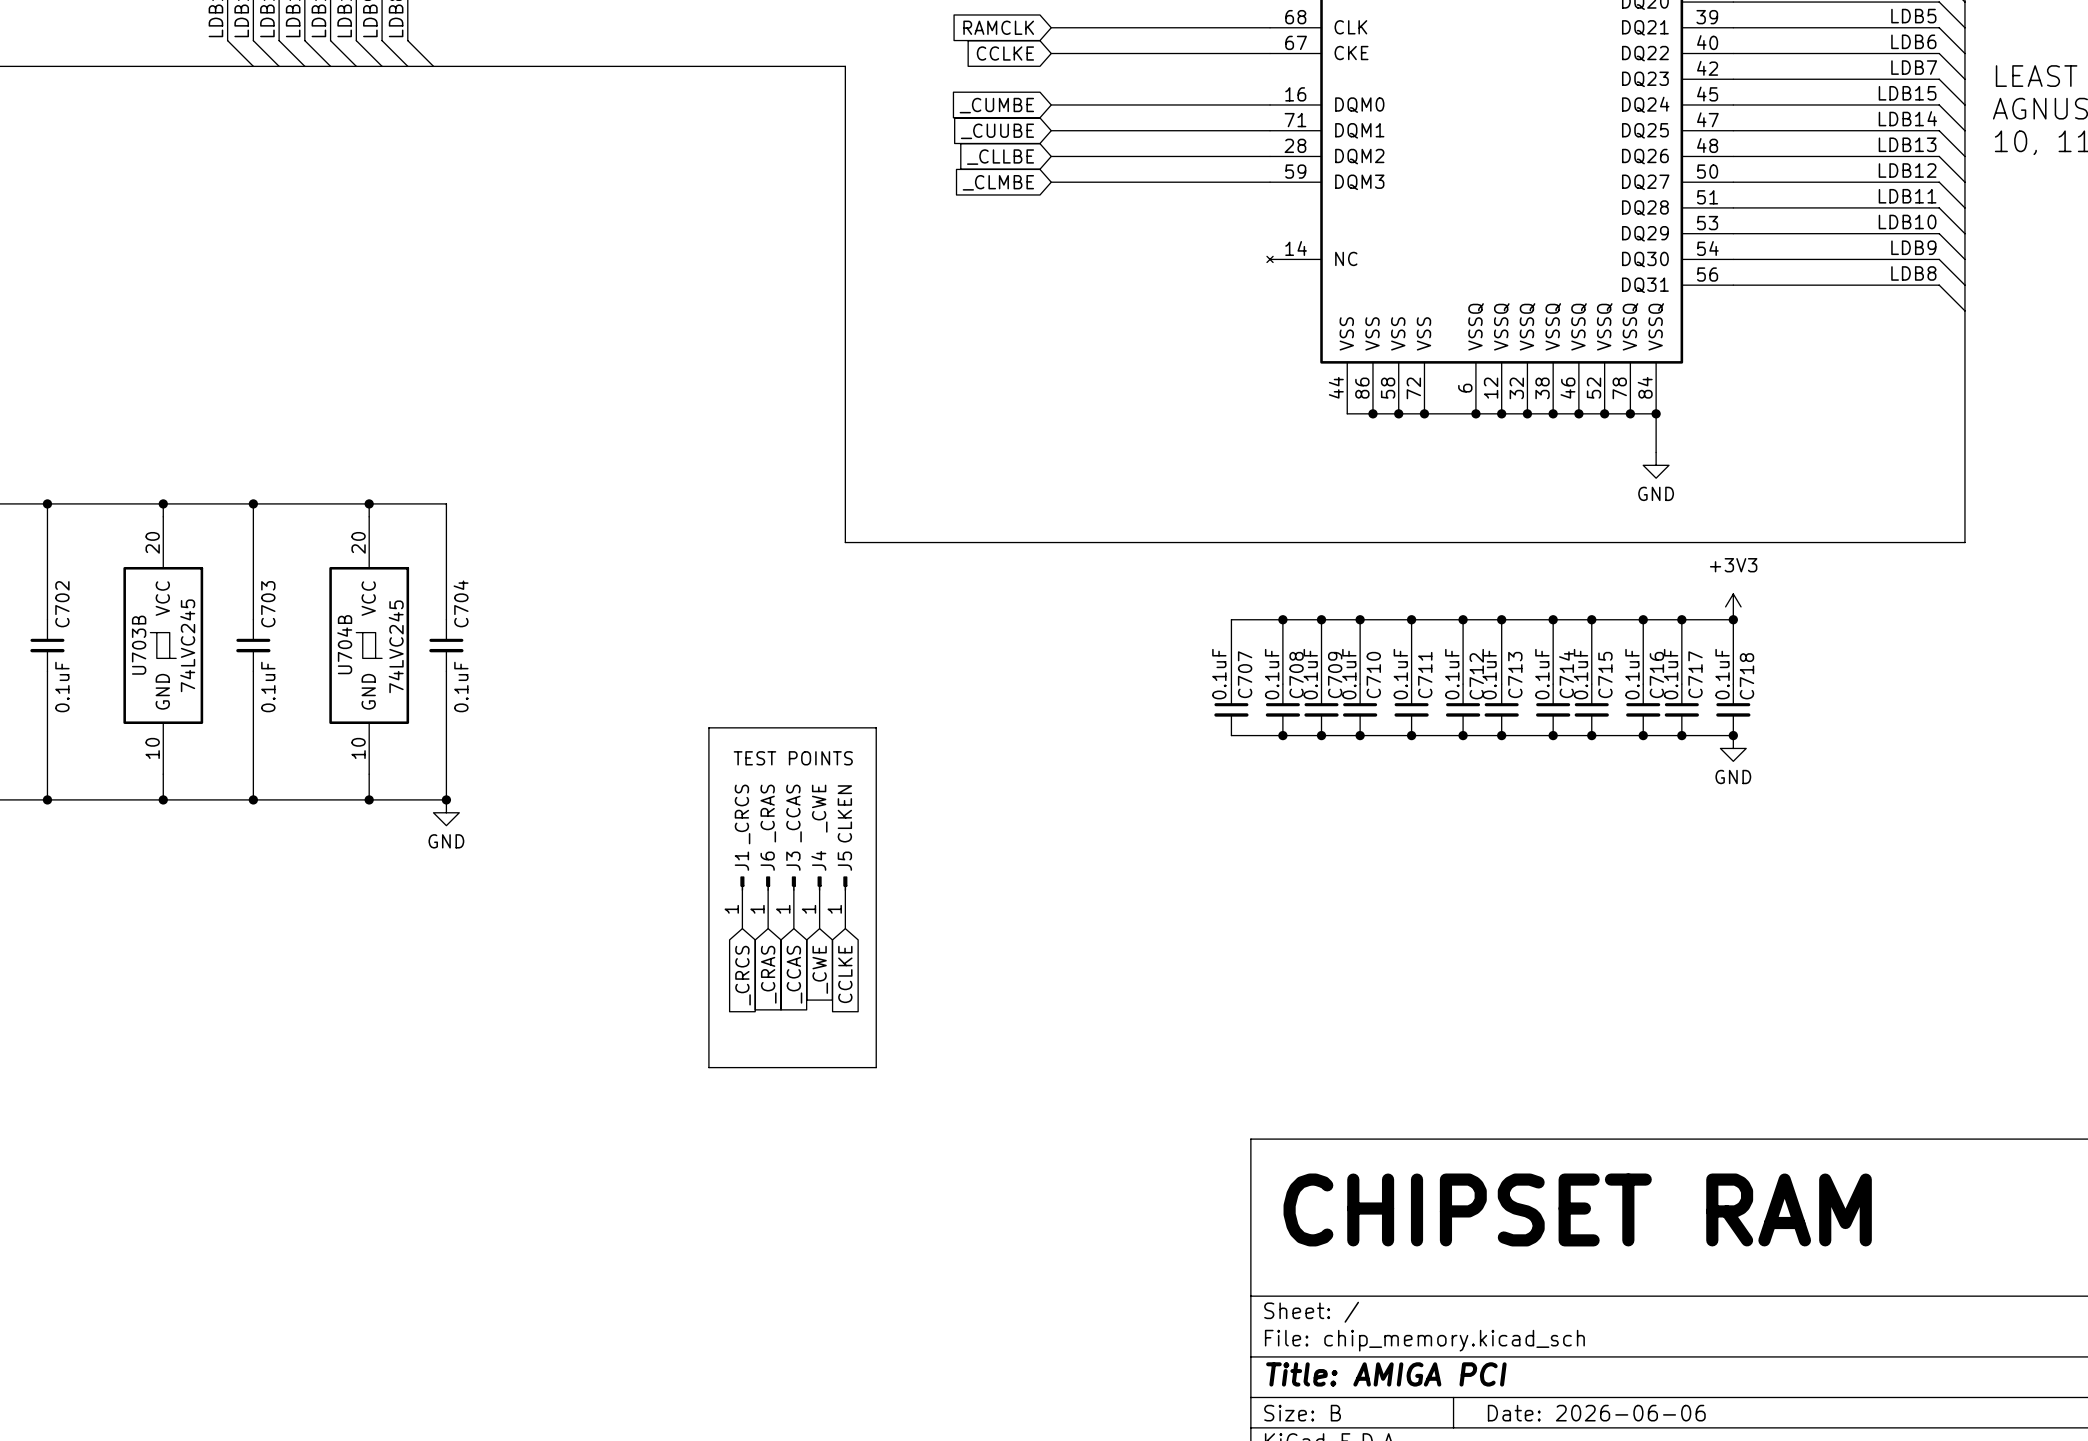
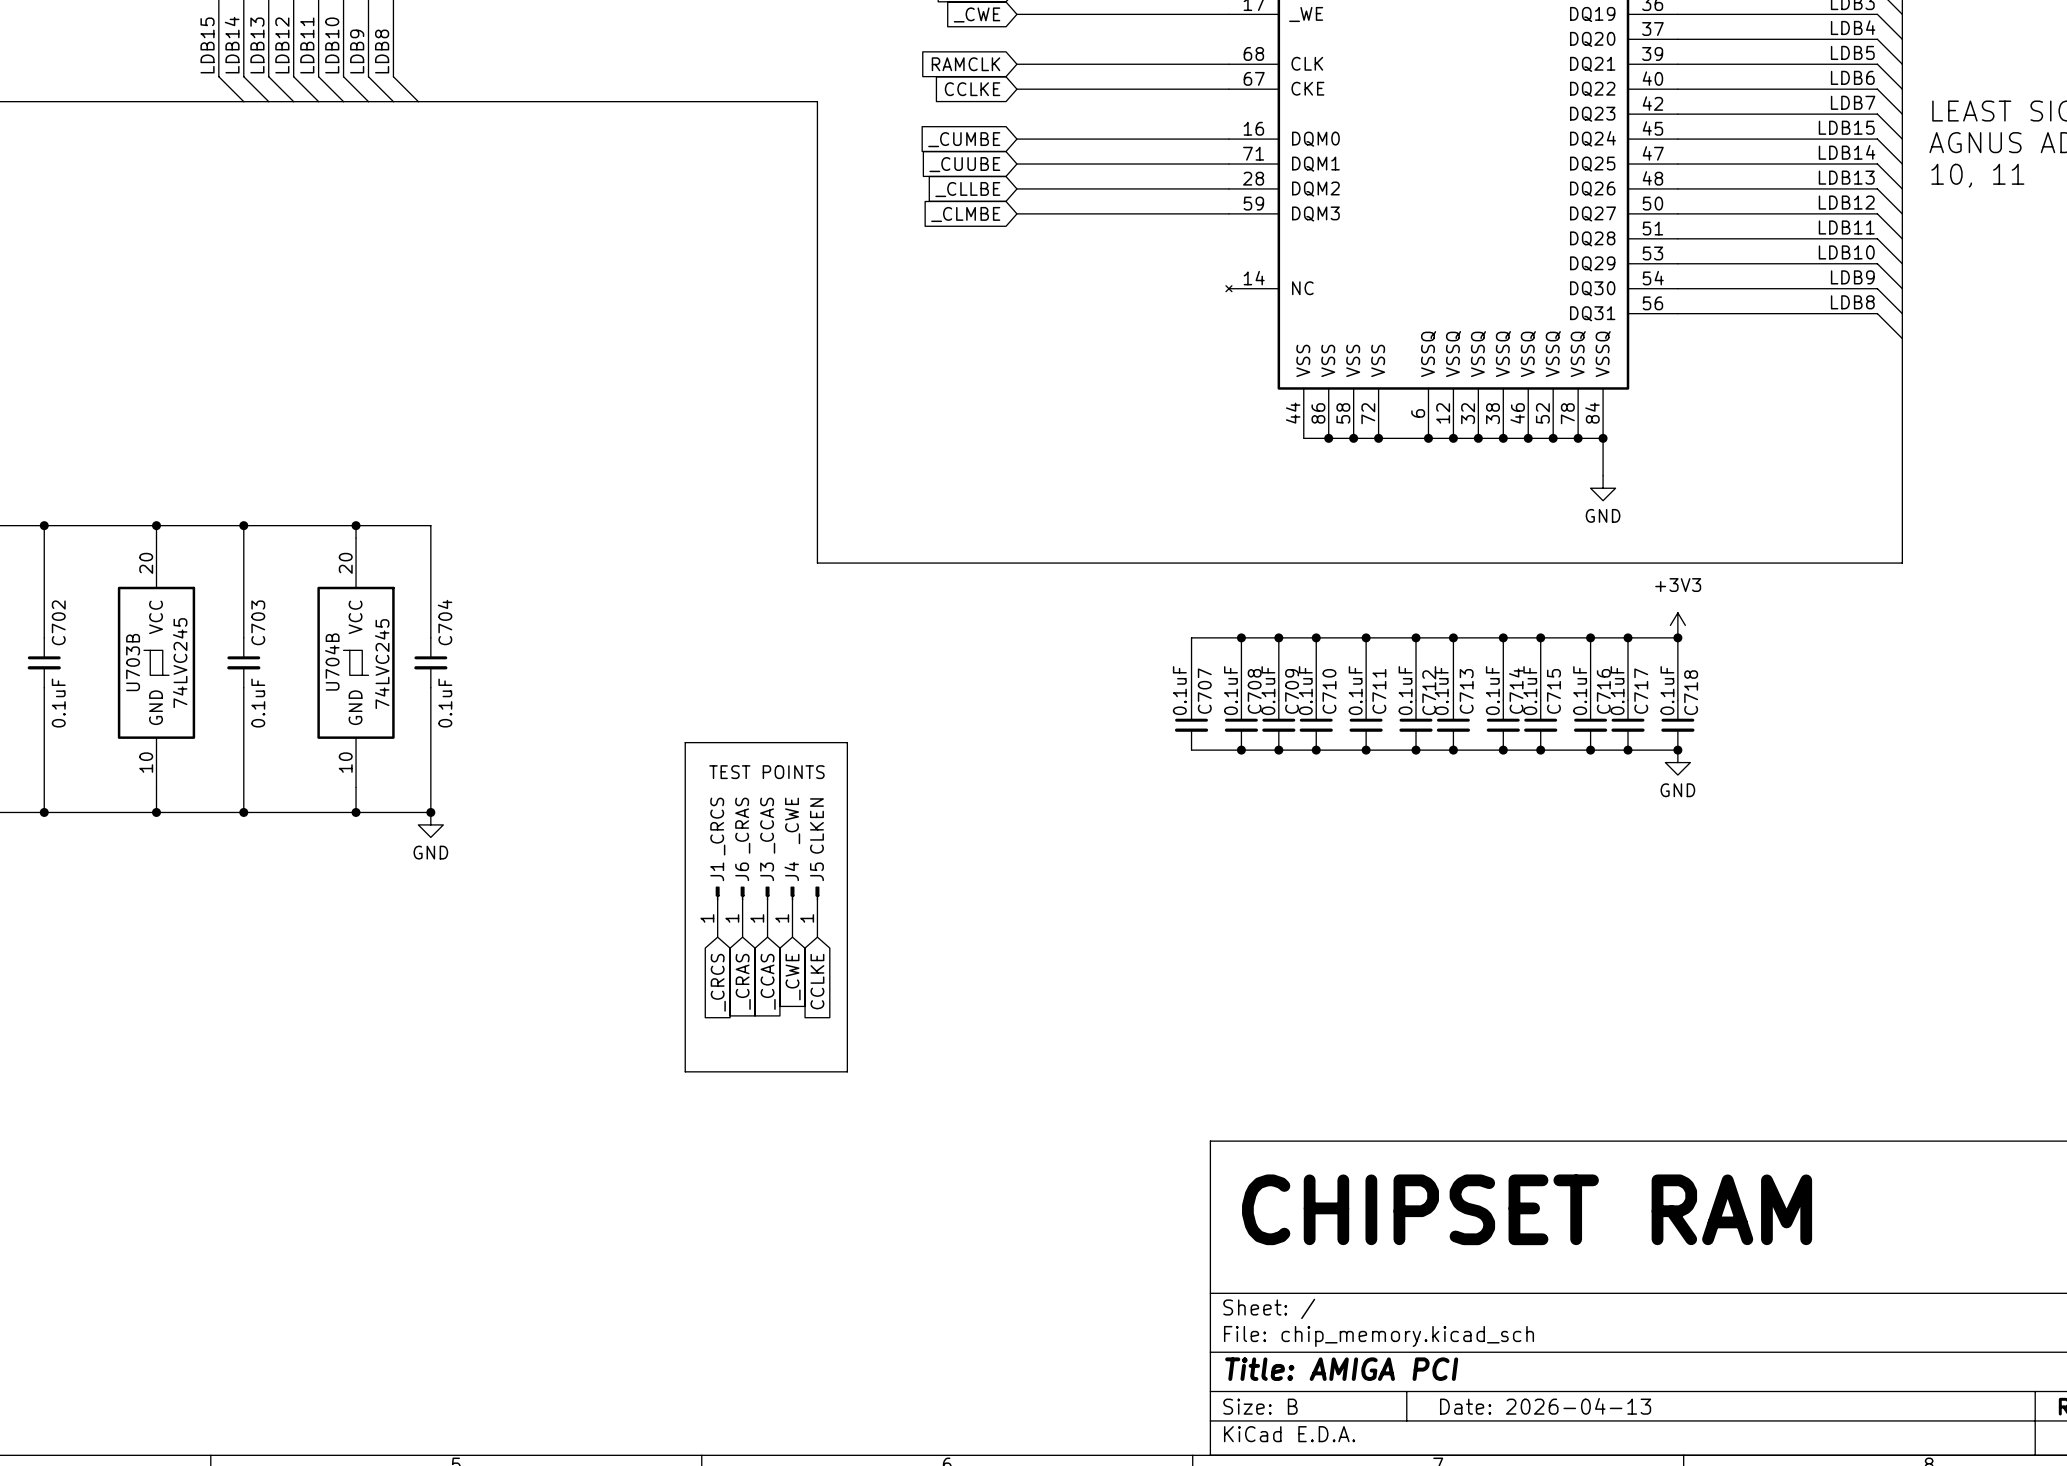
title block: Date: 2026-06-06 (1596, 1413) -> Date: 2026-04-13 (1545, 1406)

